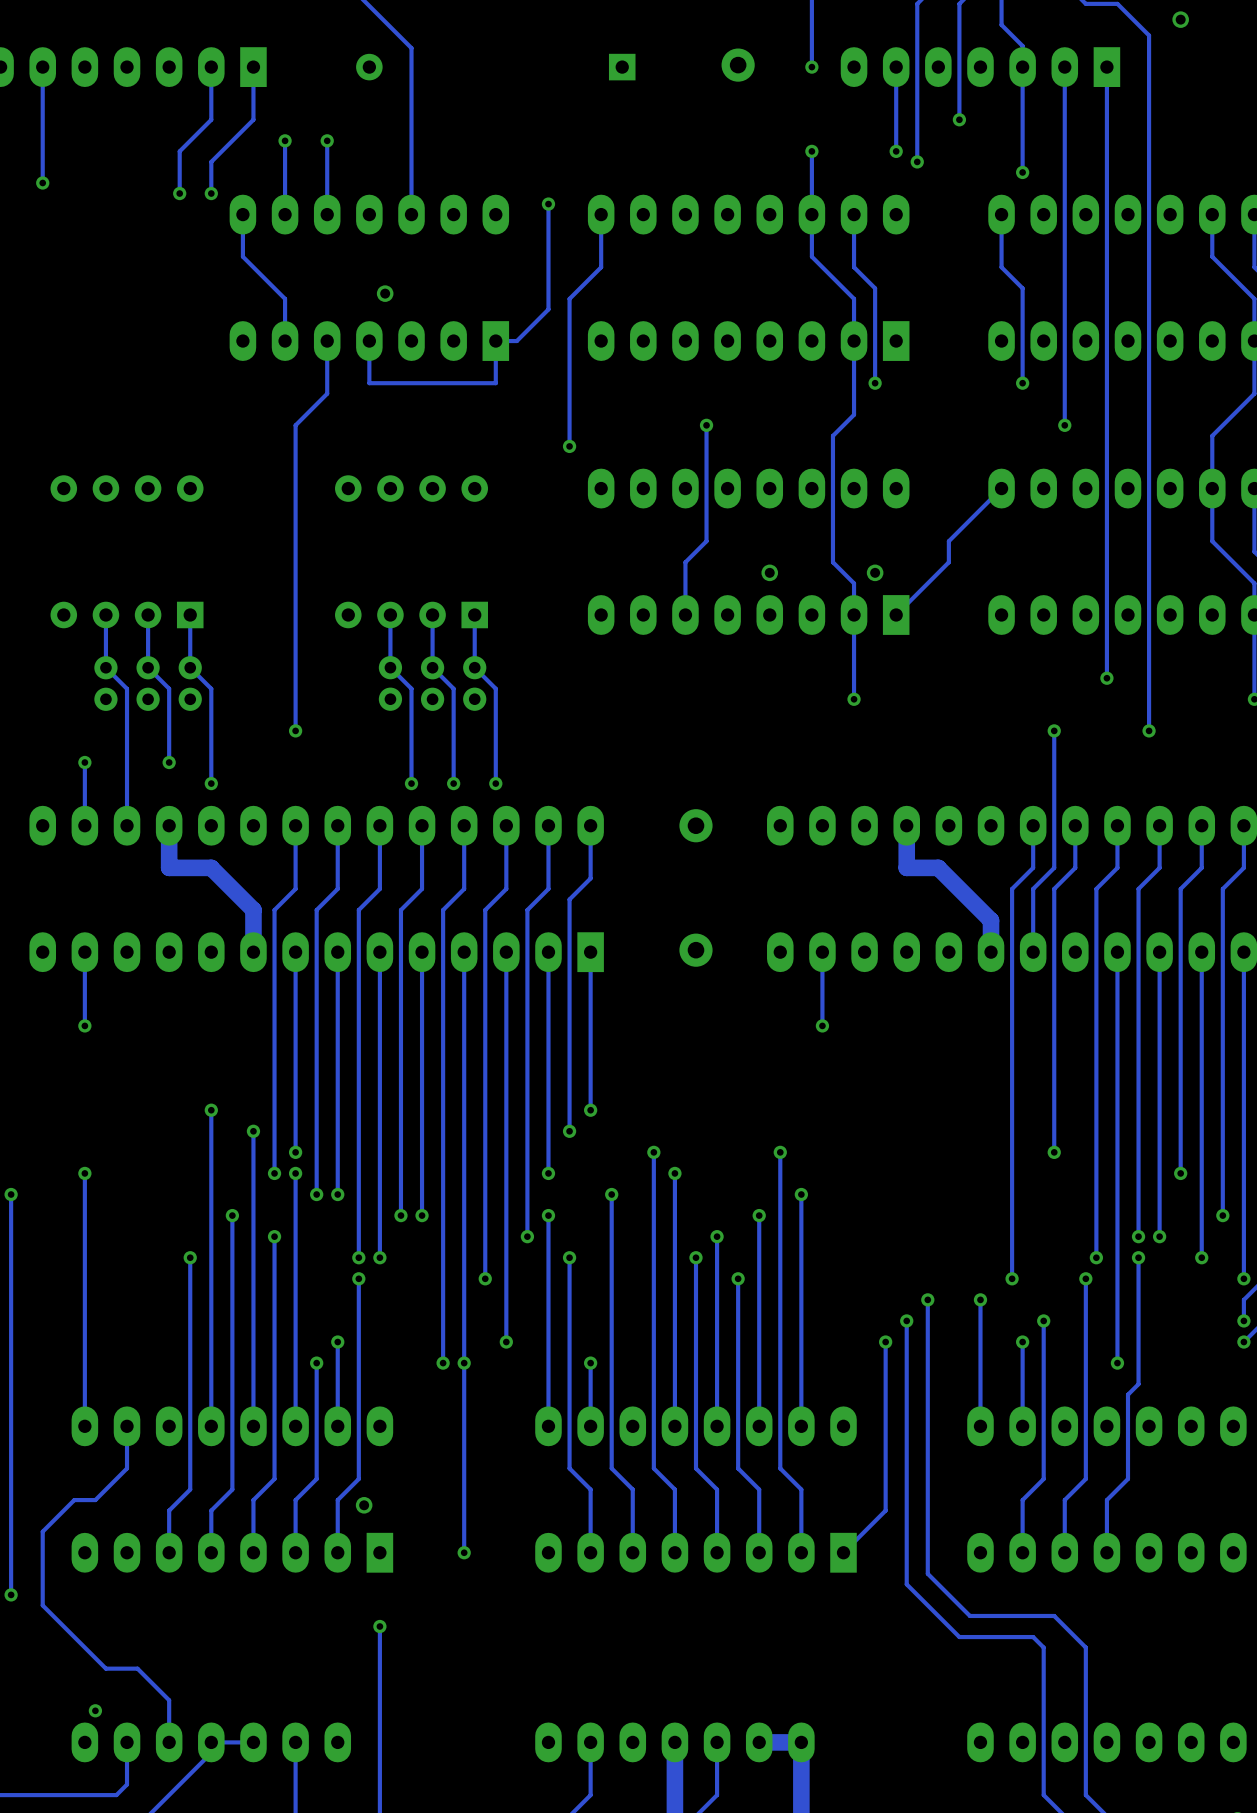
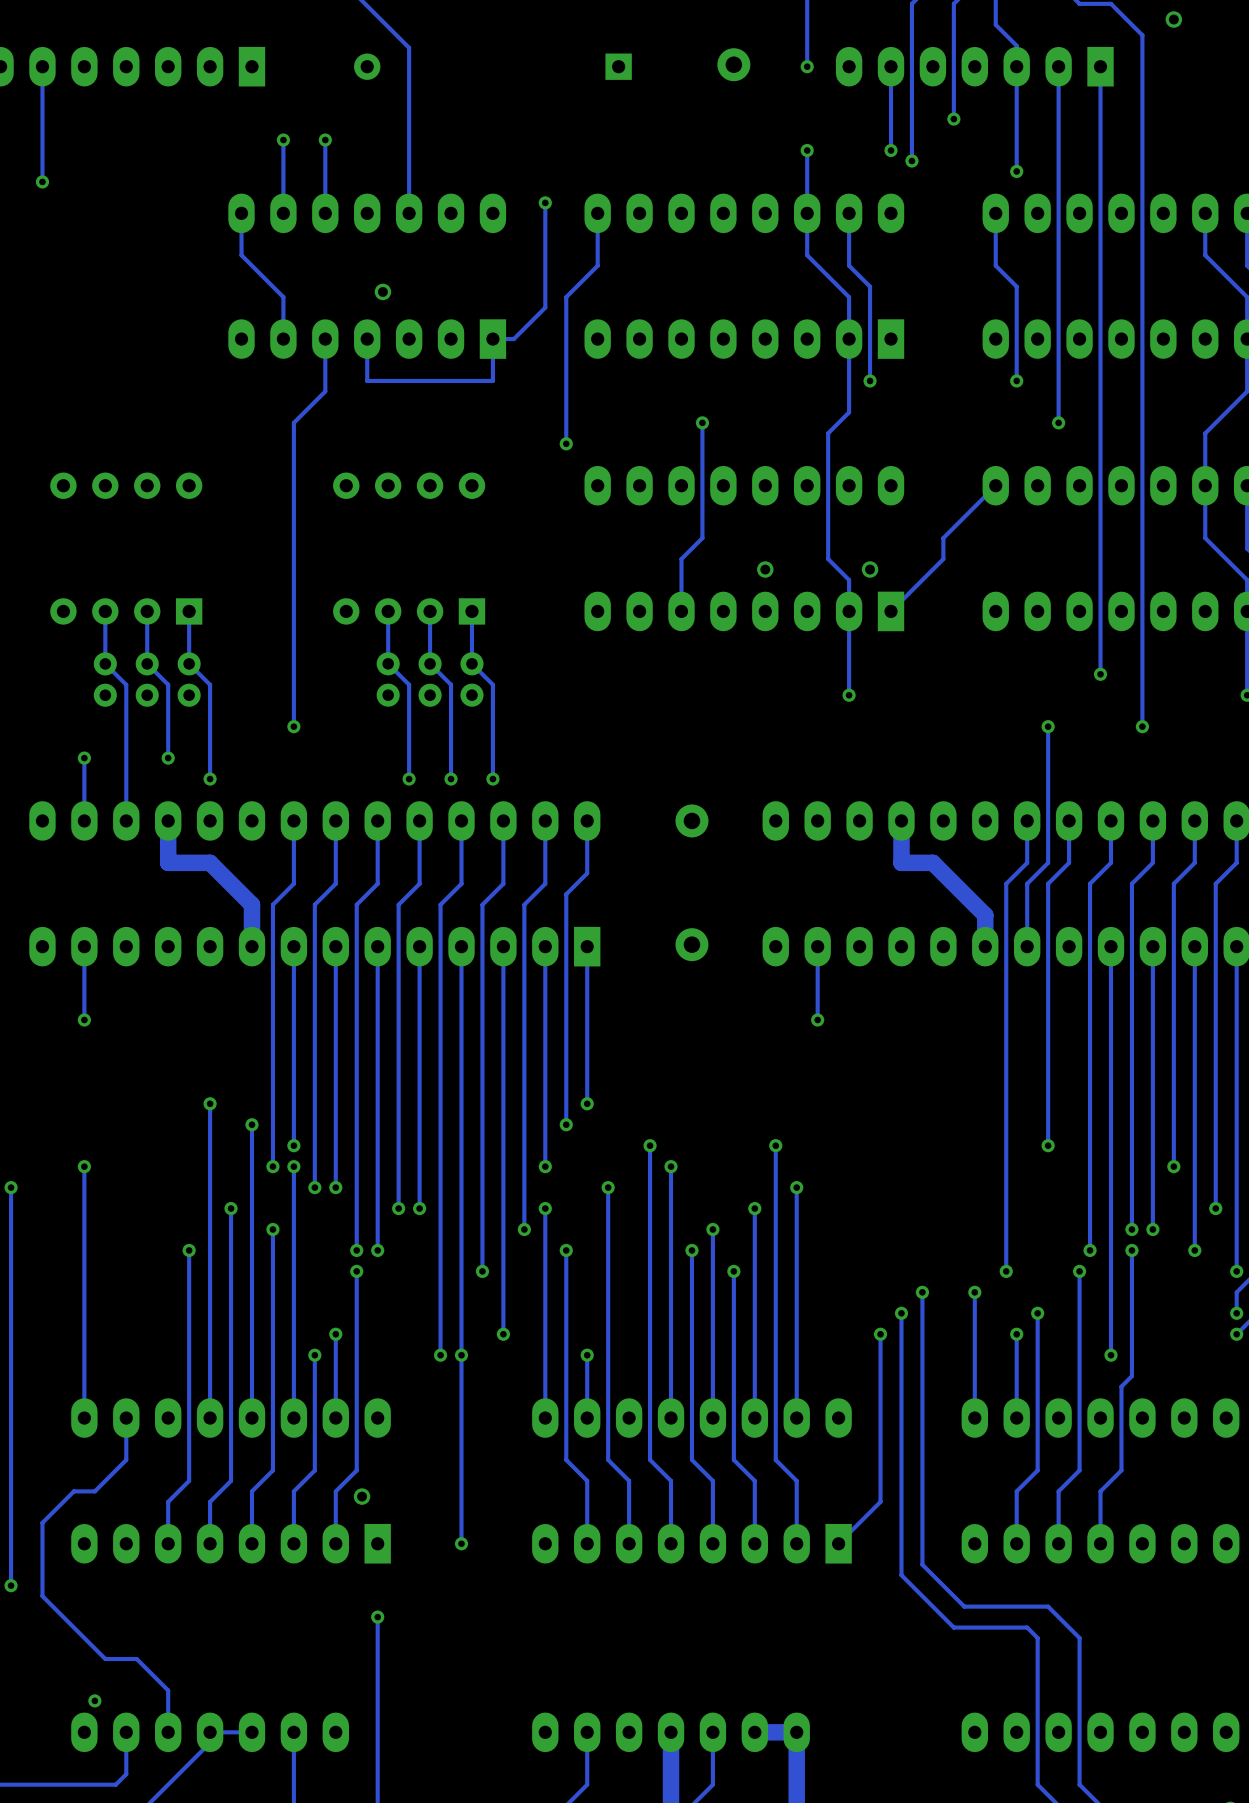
track: (211, 67) (211, 119) (179, 151) (179, 193) -> none
track: (253, 67) (253, 119) (211, 161) (211, 193) -> none
via: (179, 193) -> none
via: (211, 193) -> none

